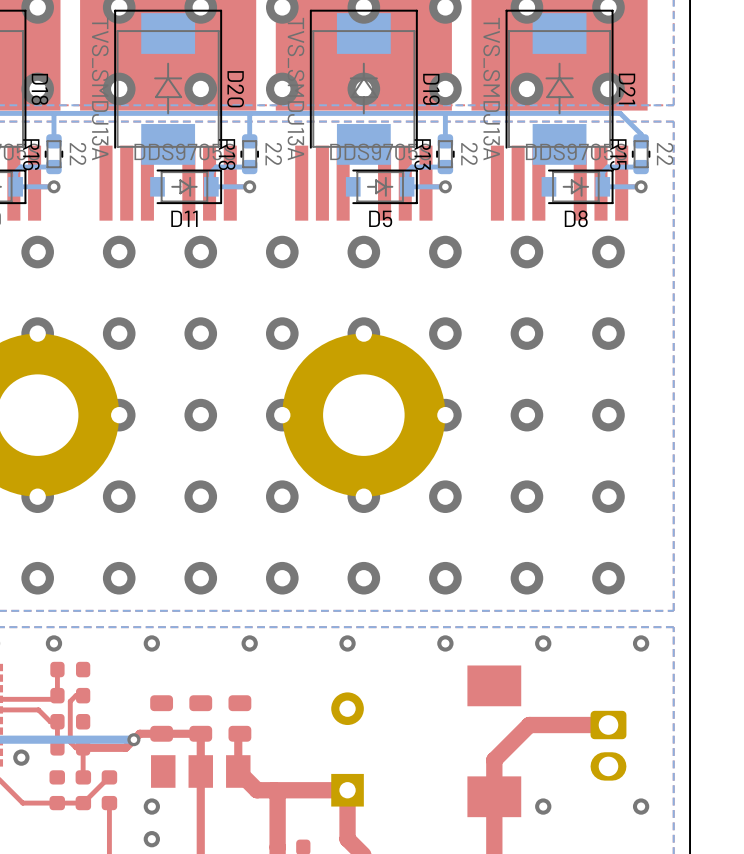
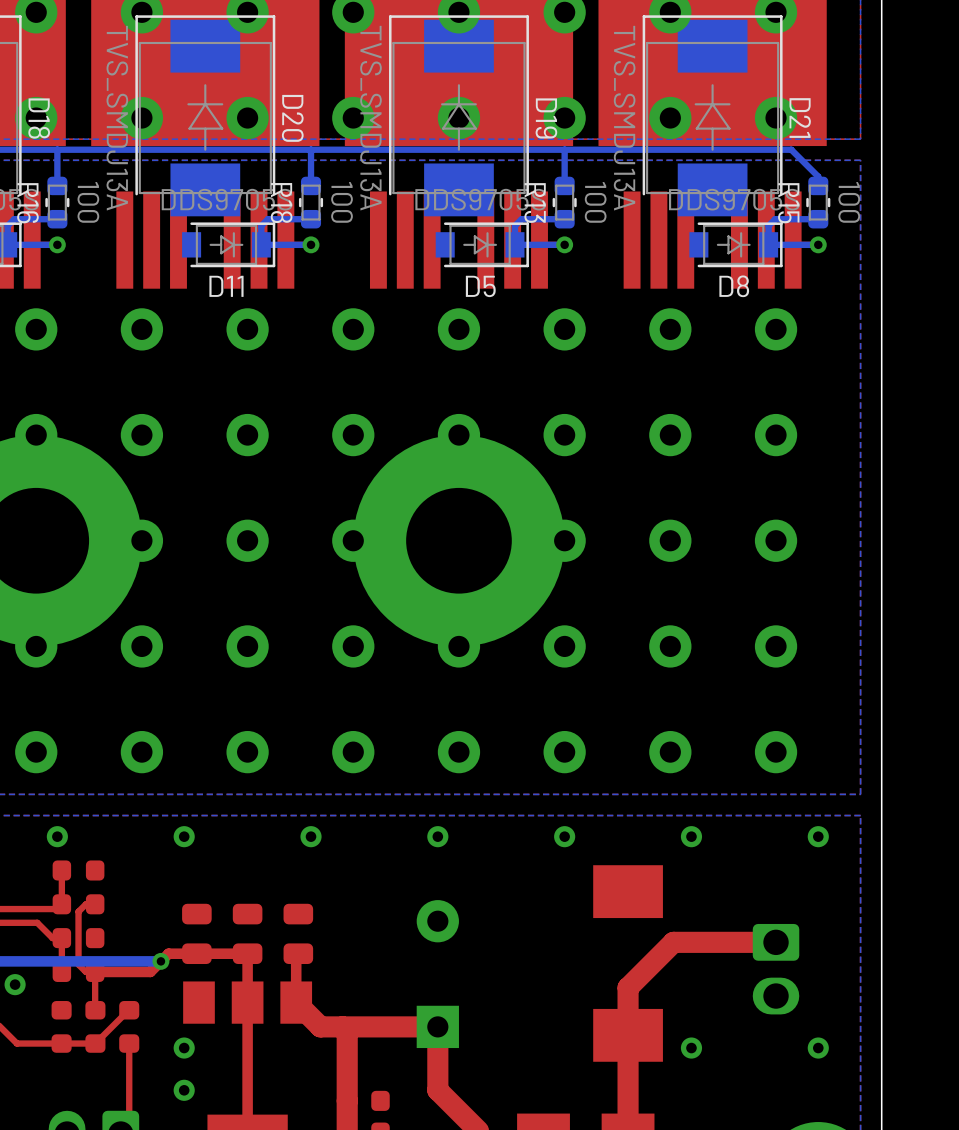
R16 value: 22 (78, 154) -> 100 (88, 202)
R18 value: 22 (273, 154) -> 100 (342, 202)
R13 value: 22 (469, 154) -> 100 (595, 202)
R15 value: 22 (665, 154) -> 100 (849, 202)

